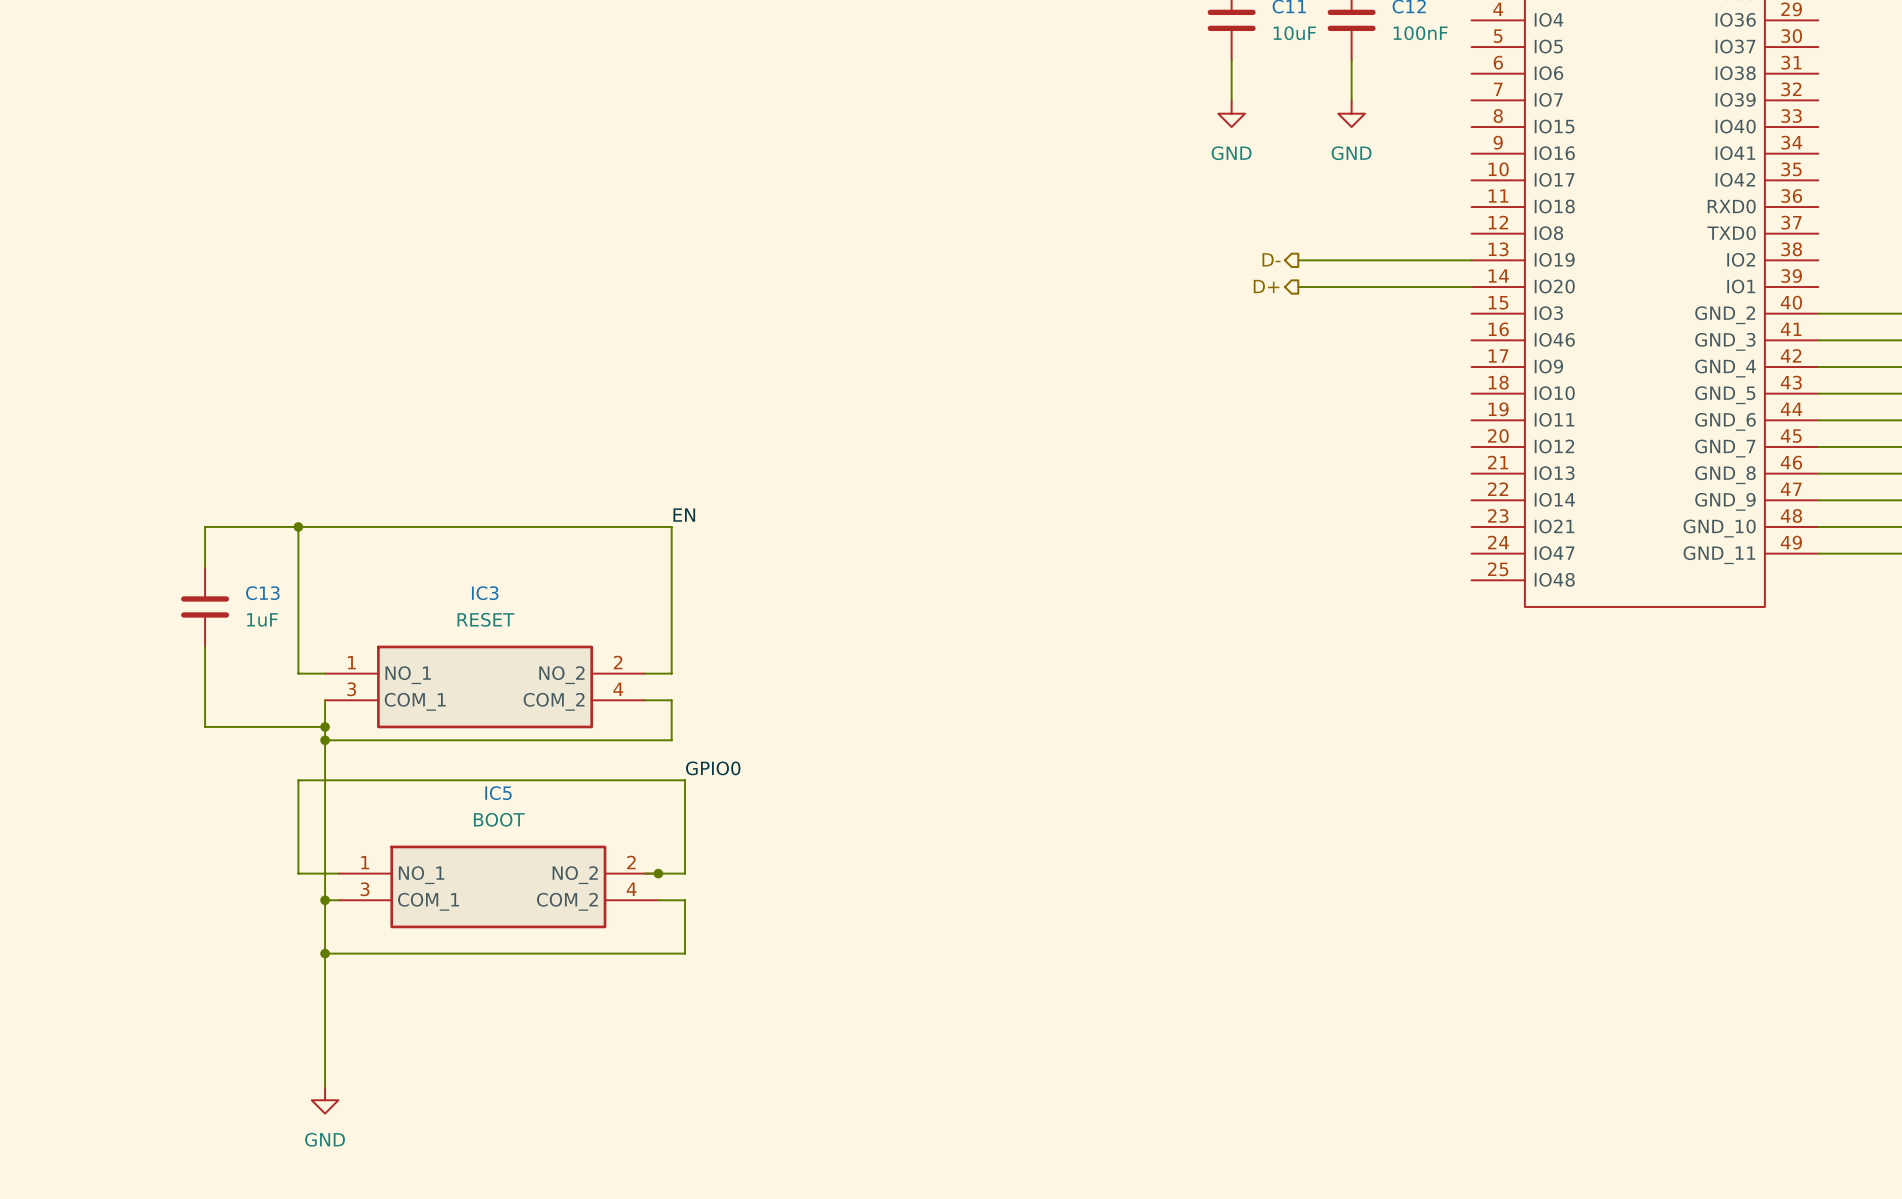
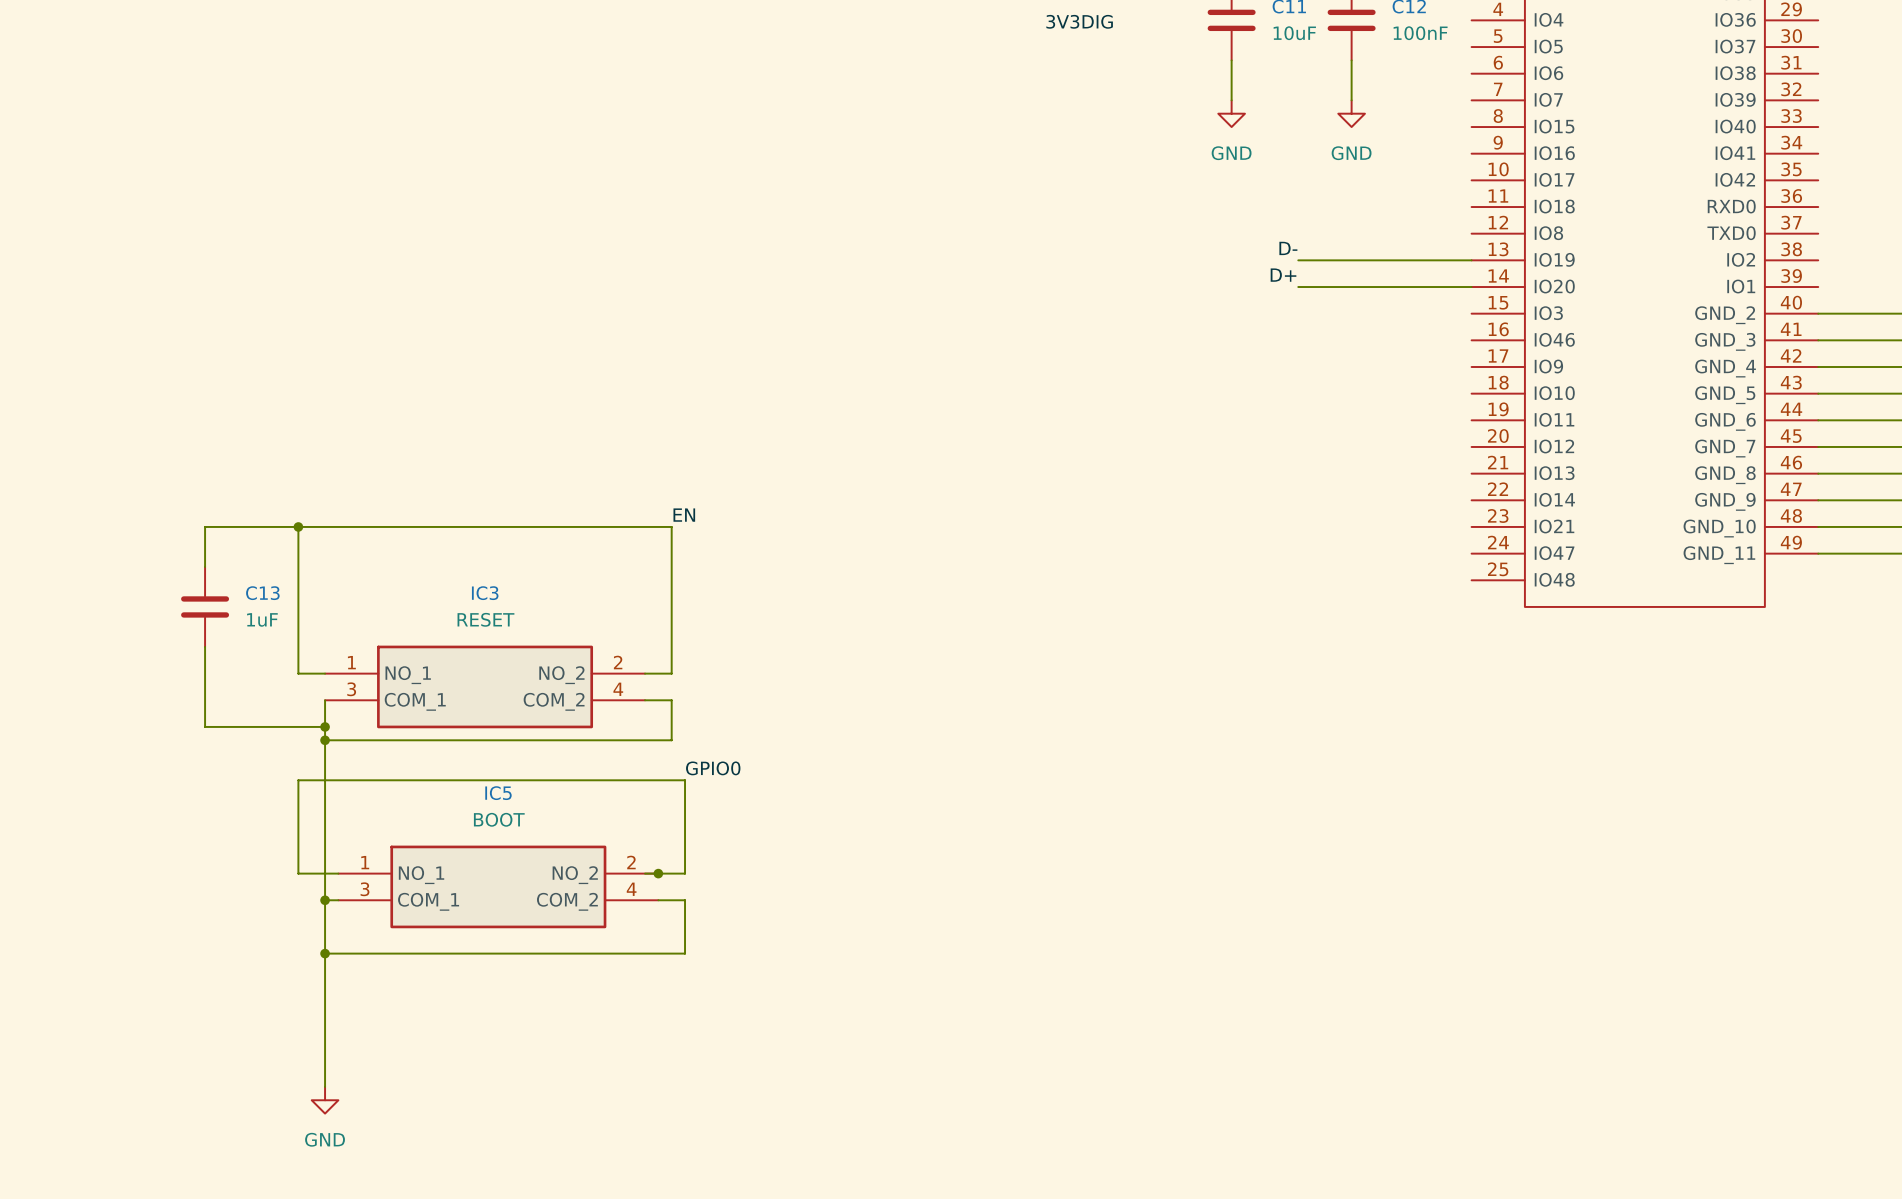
label: none -> 3V3DIG (1079, 21)
label: none -> D- (1288, 248)
hierarchical label: D- (1271, 259) -> none
label: none -> D+ (1283, 275)
hierarchical label: D+ (1266, 286) -> none

